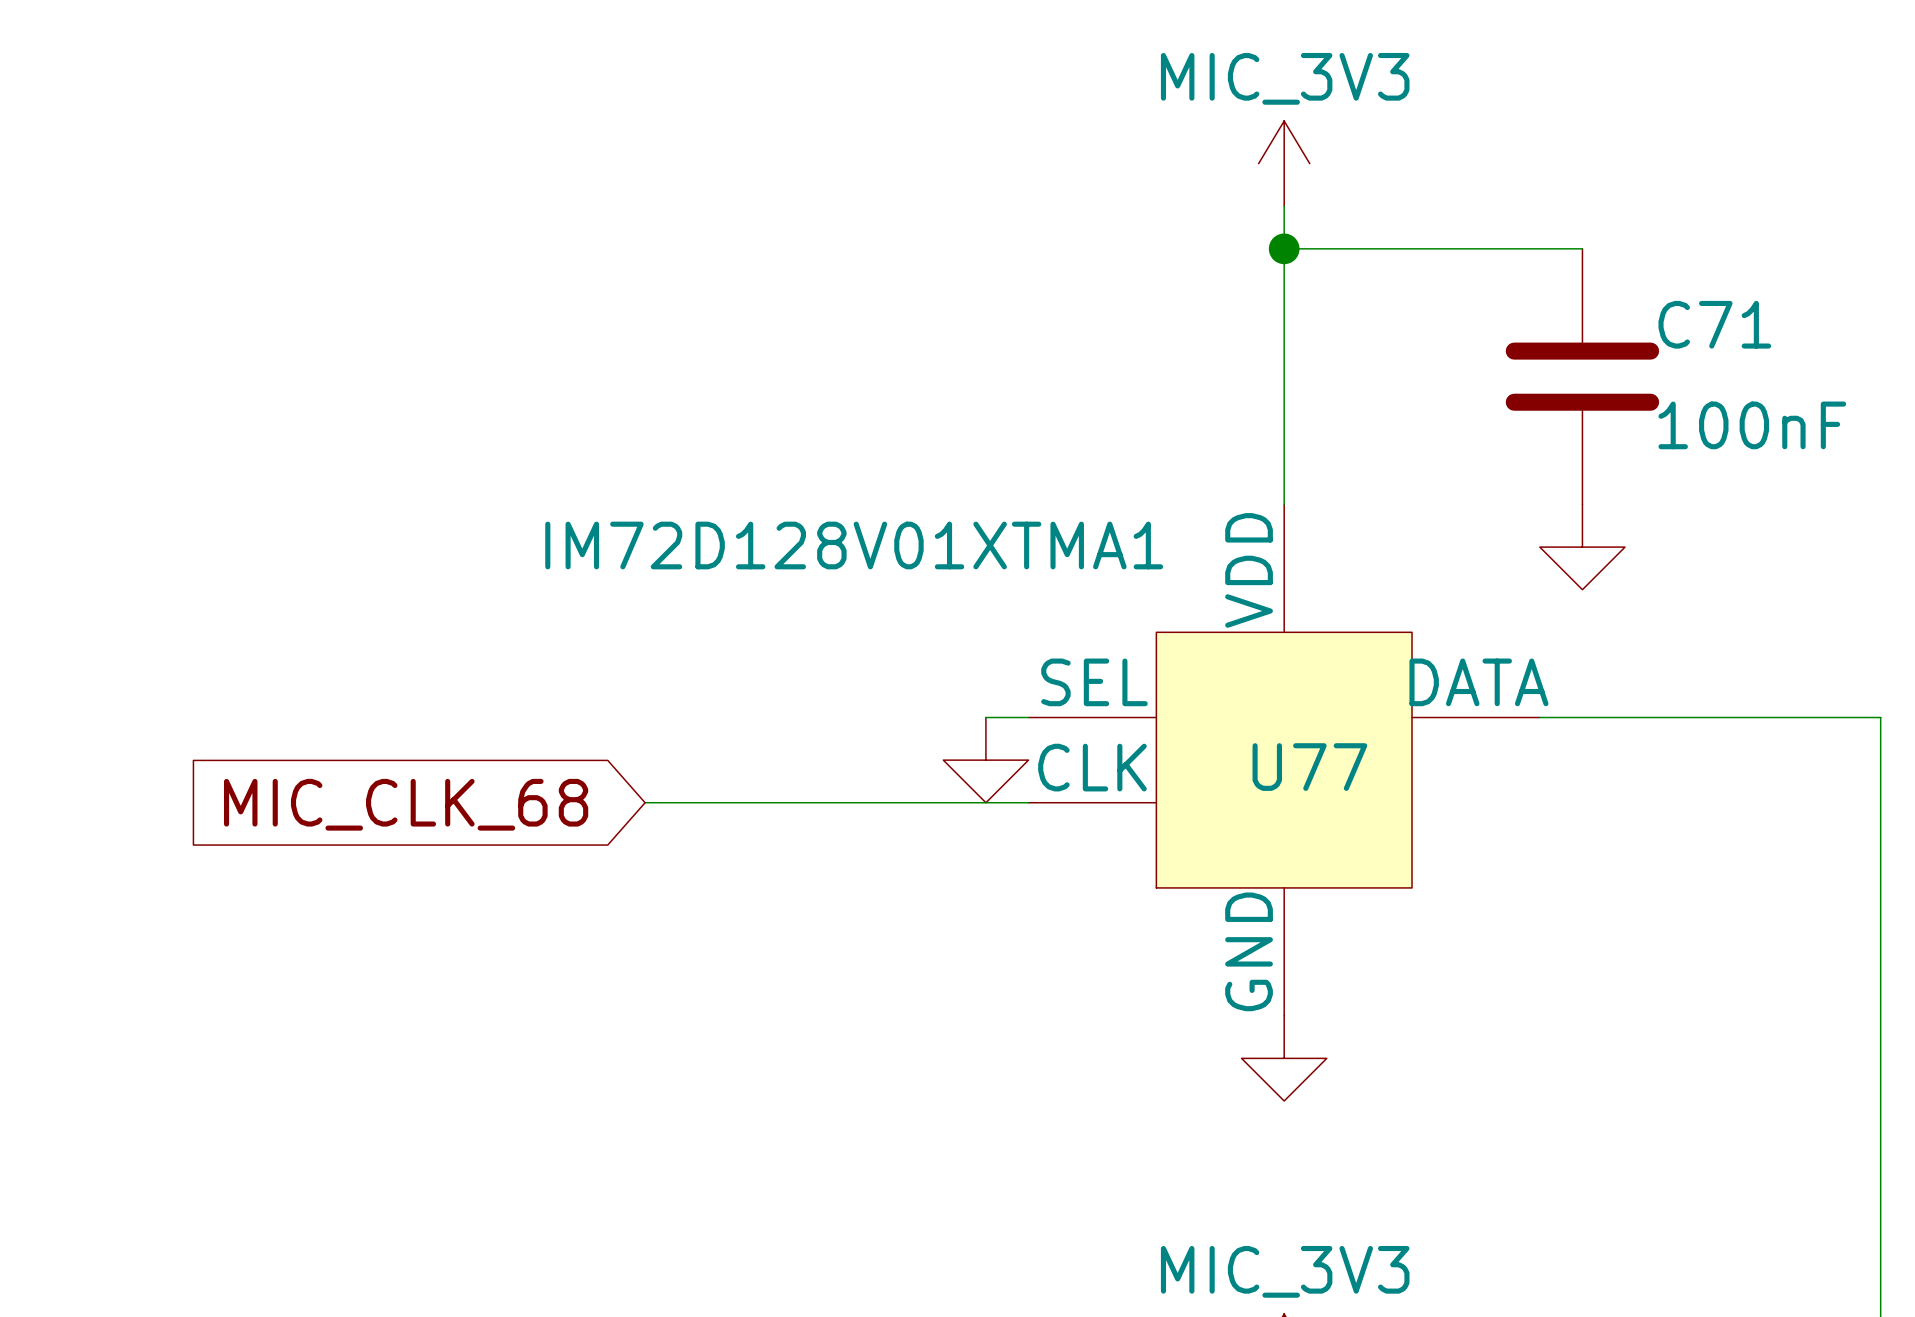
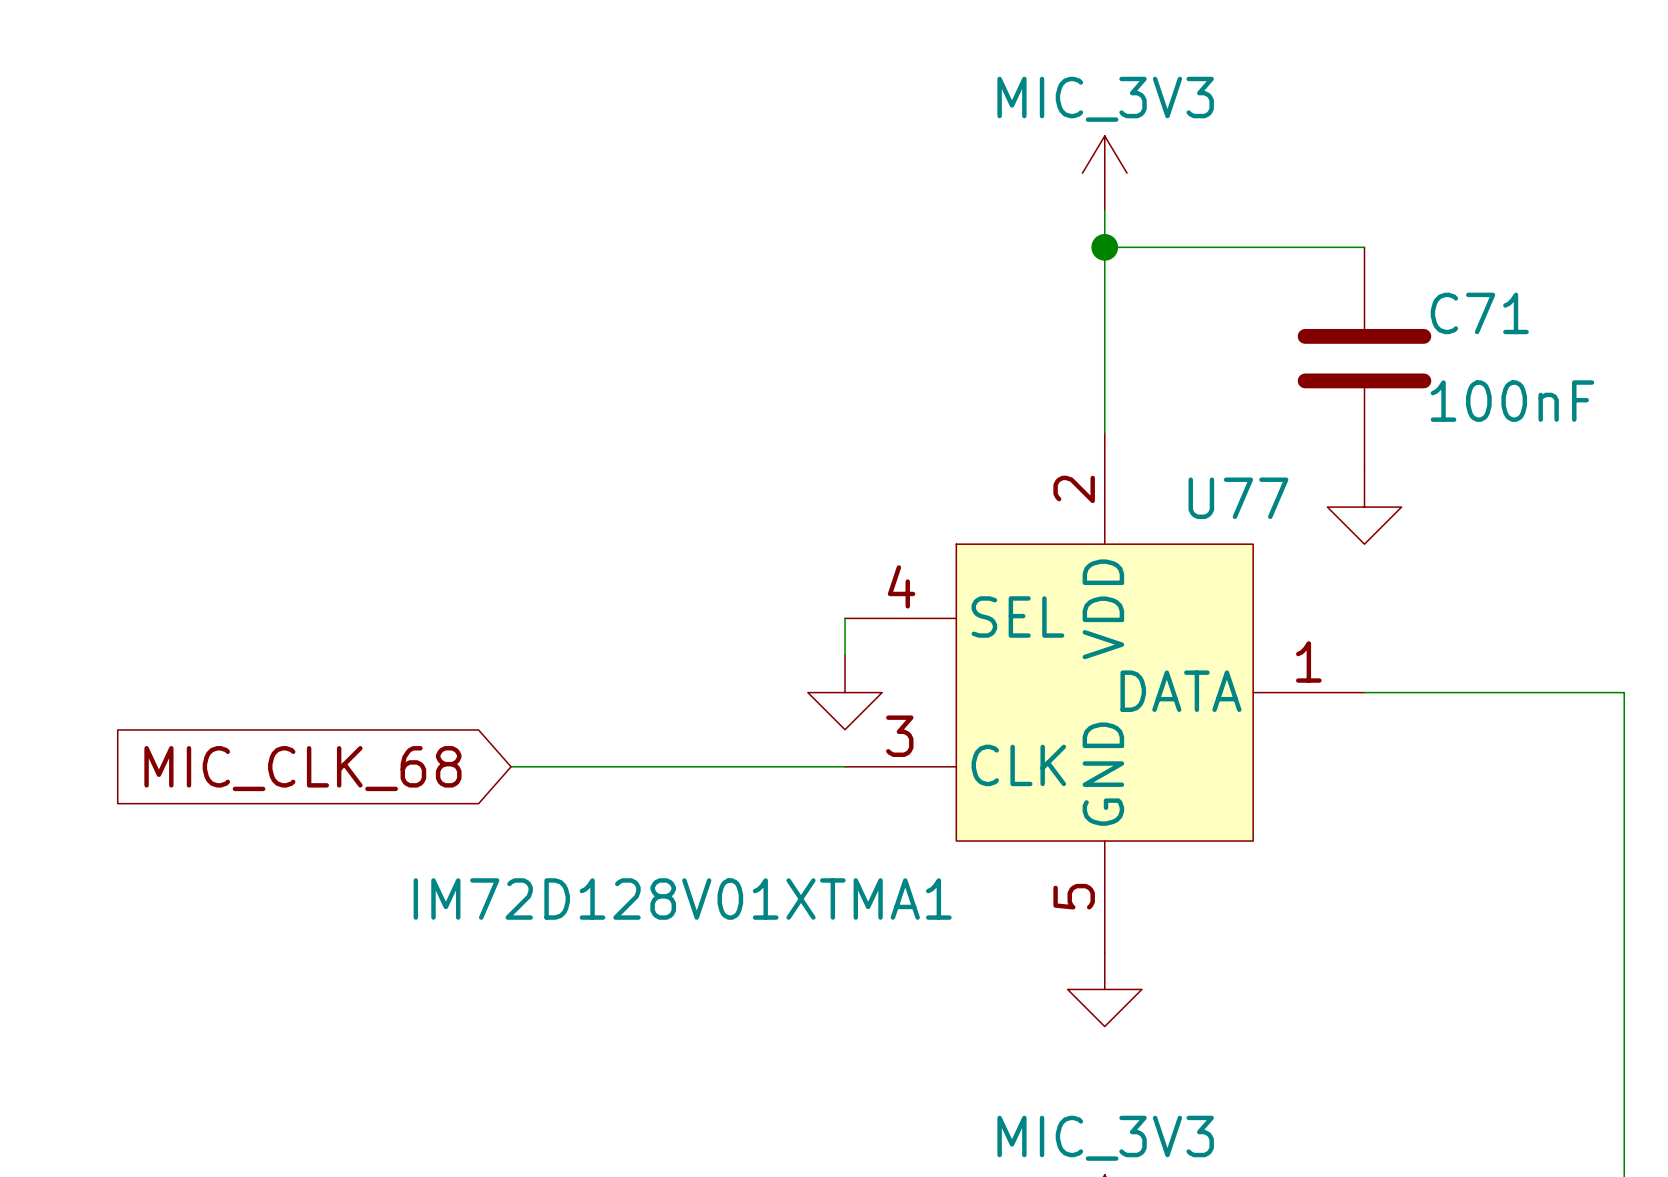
U77 symbol: [1028, 504, 1540, 1016] -> [845, 432, 1365, 953]
U77 value position: IM72D128V01XTMA1 (854, 545) -> IM72D128V01XTMA1 (682, 899)
wire: (985, 717) (1028, 717) -> (845, 655) (845, 618)
wire: (1539, 717) (1880, 717) (1880, 760) -> (1364, 692) (1624, 692)
U77 name position: U77 (1309, 767) -> U77 (1238, 498)
wire: (645, 802) (1028, 802) -> (511, 766) (845, 766)
global label position: MIC_CLK_68 (406, 804) -> MIC_CLK_68 (302, 768)
power symbol position: (1284, 1058) -> (1104, 989)

